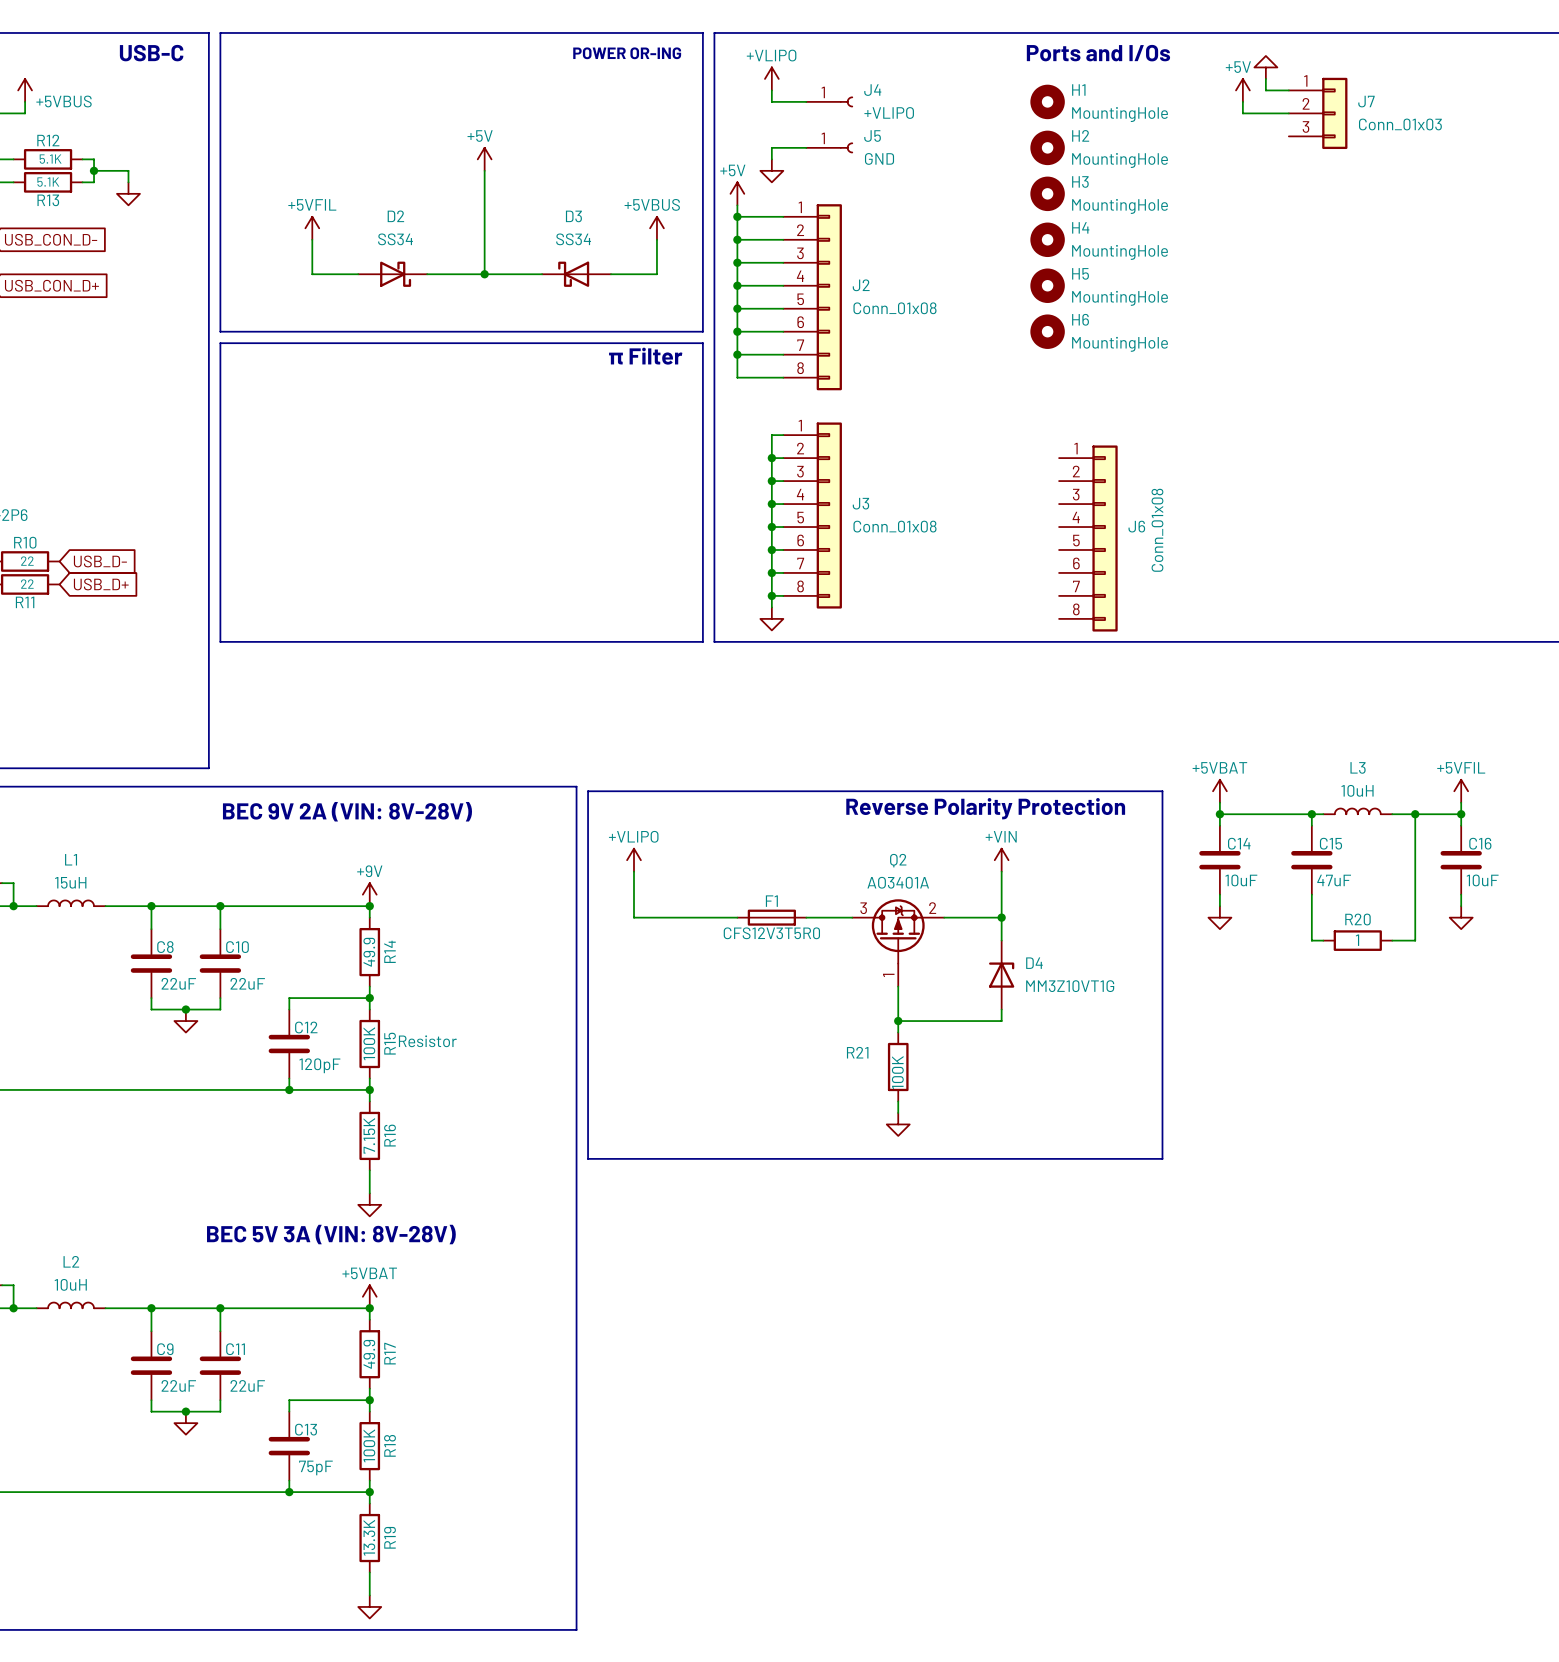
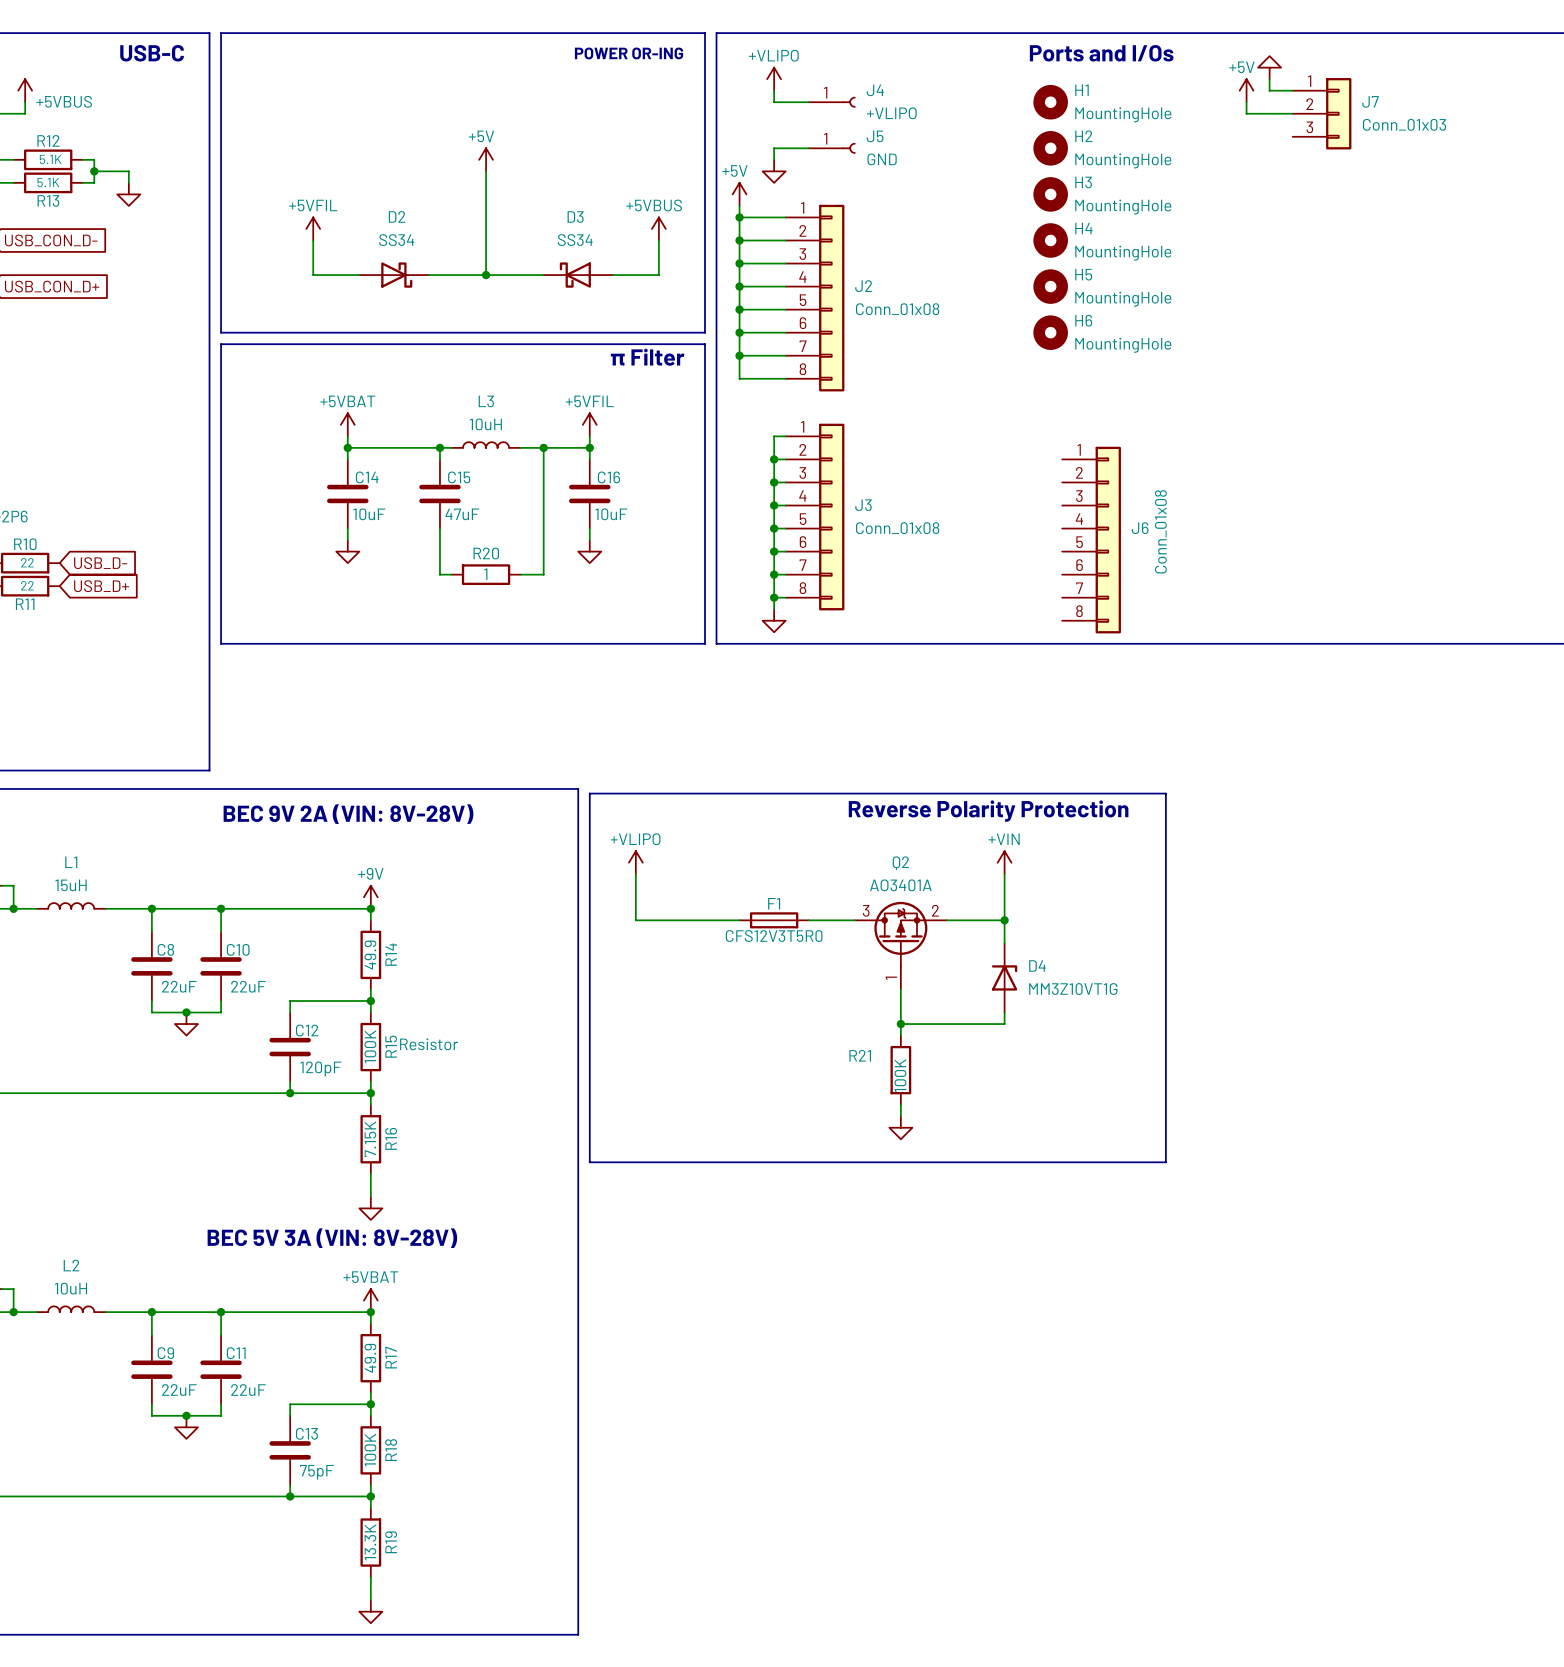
power symbol: none -> +5VBAT (347, 424)
power symbol: none -> +5VFIL (589, 424)
wire: none -> (347, 436) (347, 459)
wire: none -> (589, 436) (589, 459)
wire: none -> (347, 447) (451, 447)
junction: none -> (347, 447)
wire: none -> (439, 447) (439, 459)
junction: none -> (439, 447)
wire: none -> (520, 447) (589, 447)
wire: none -> (543, 447) (543, 574) (520, 574)
junction: none -> (543, 447)
junction: none -> (589, 447)
wire: none -> (347, 528) (347, 540)
wire: none -> (439, 528) (439, 574) (451, 574)
wire: none -> (589, 528) (589, 540)
power symbol: none -> (347, 551)
power symbol: none -> (589, 551)
power symbol: +5VBAT (1219, 791) -> none
power symbol: +5VFIL (1461, 791) -> none
wire: (1219, 802) (1219, 825) -> none
wire: (1461, 802) (1461, 825) -> none
L3 position: (1357, 811) -> (486, 445)
wire: (1219, 814) (1323, 814) -> none
junction: (1219, 814) -> none
wire: (1311, 814) (1311, 825) -> none
junction: (1311, 814) -> none
wire: (1392, 814) (1461, 814) -> none
wire: (1415, 814) (1415, 940) (1392, 940) -> none
junction: (1415, 814) -> none
junction: (1461, 814) -> none
C14 position: (1219, 860) -> (347, 493)
C15 position: (1311, 860) -> (439, 493)
C16 position: (1461, 860) -> (589, 493)
wire: (1219, 894) (1219, 906) -> none
wire: (1311, 894) (1311, 940) (1323, 940) -> none
wire: (1461, 894) (1461, 906) -> none
power symbol: (1219, 917) -> none
power symbol: (1461, 917) -> none
R20 position: (1357, 940) -> (486, 574)

